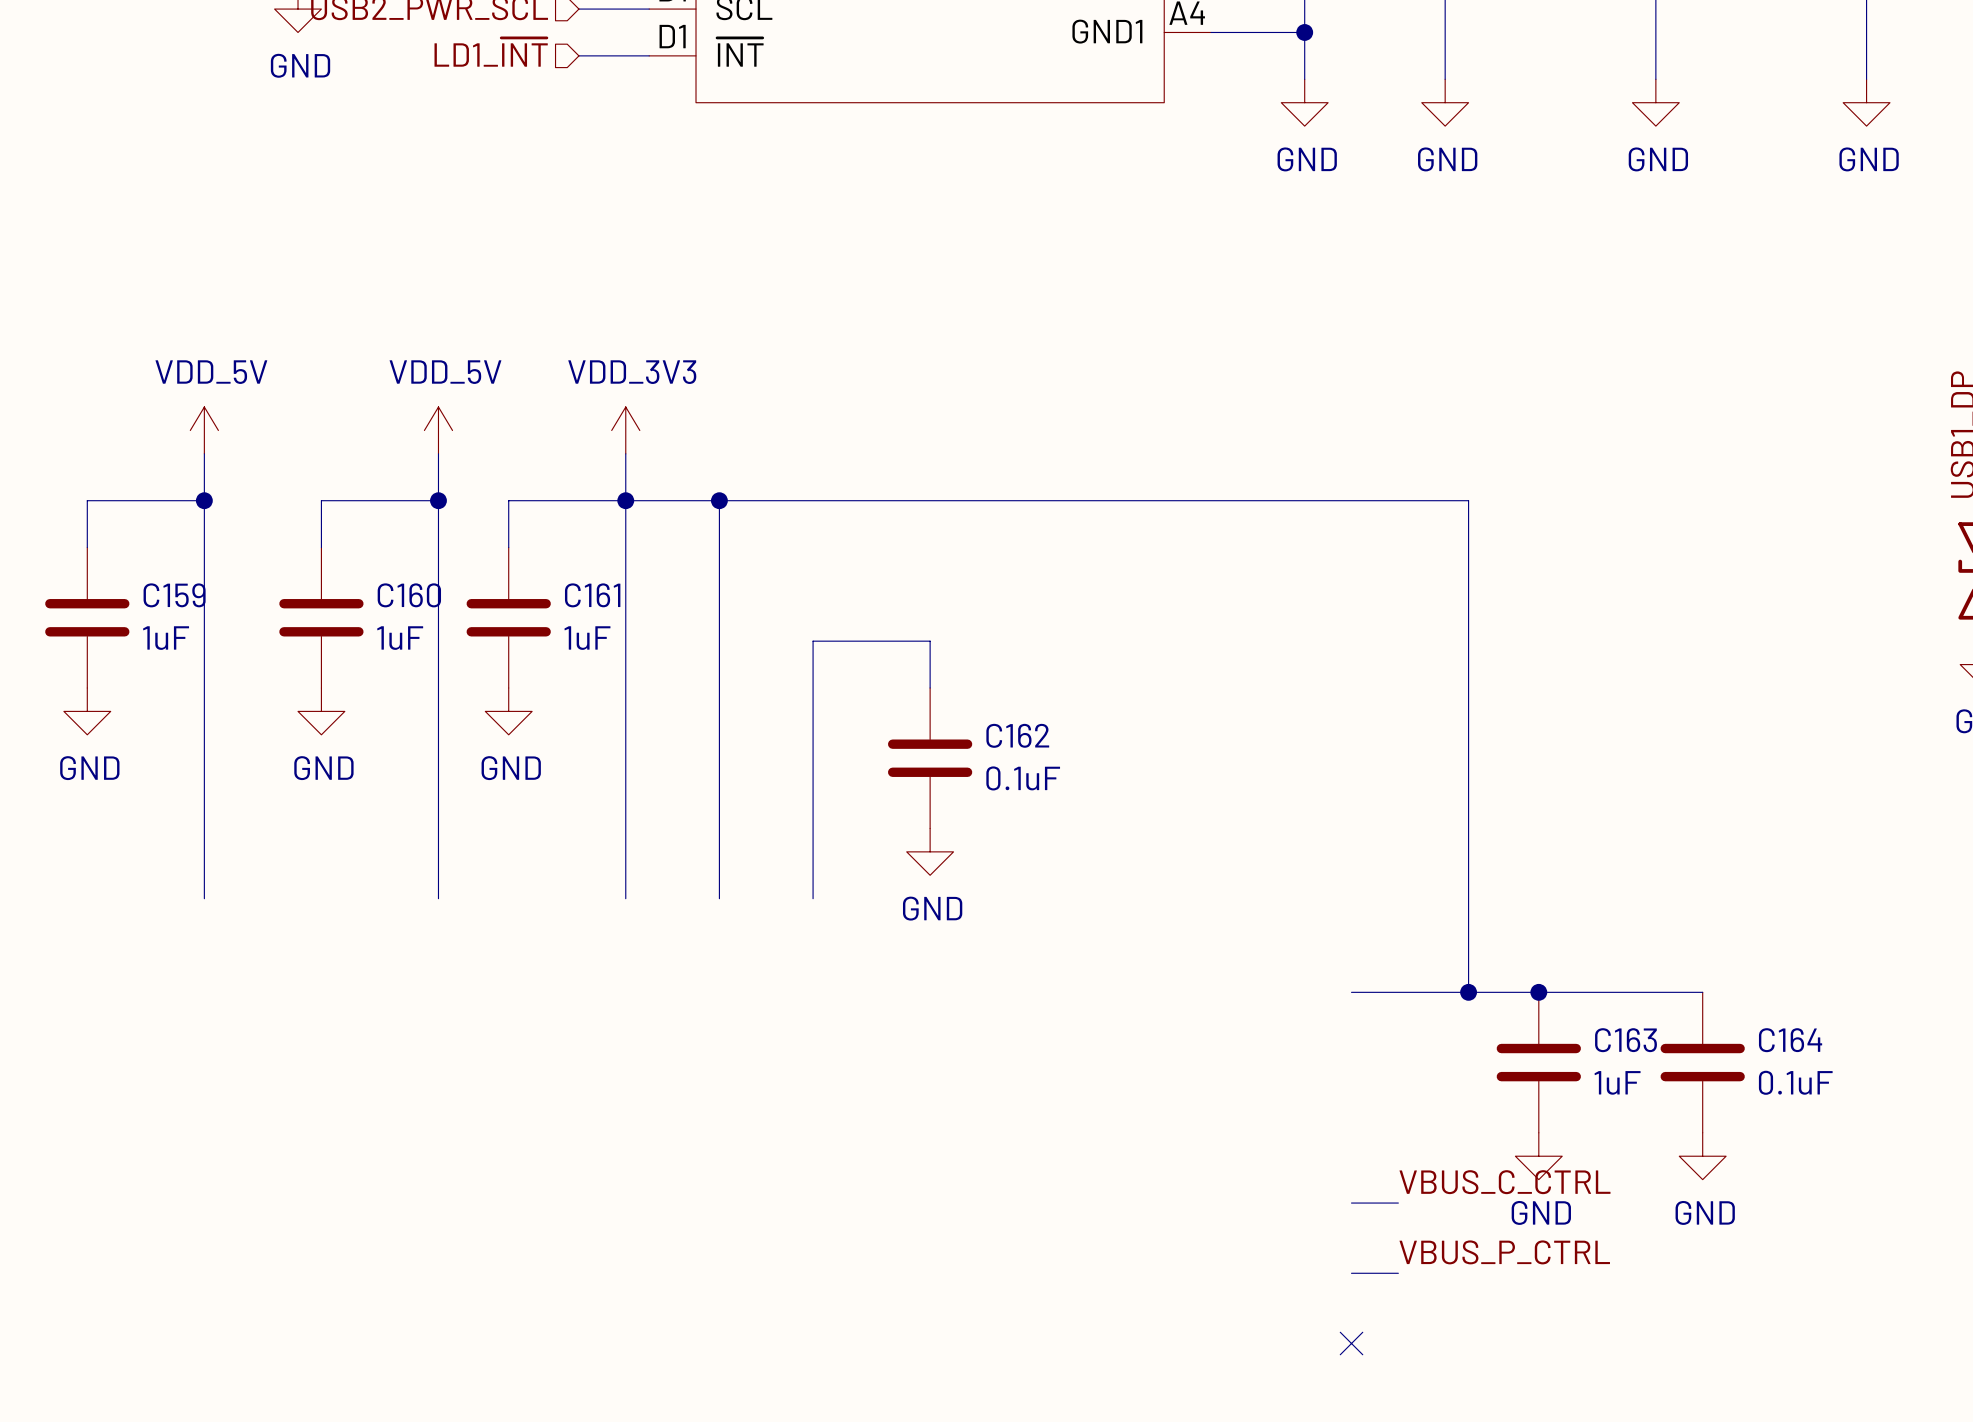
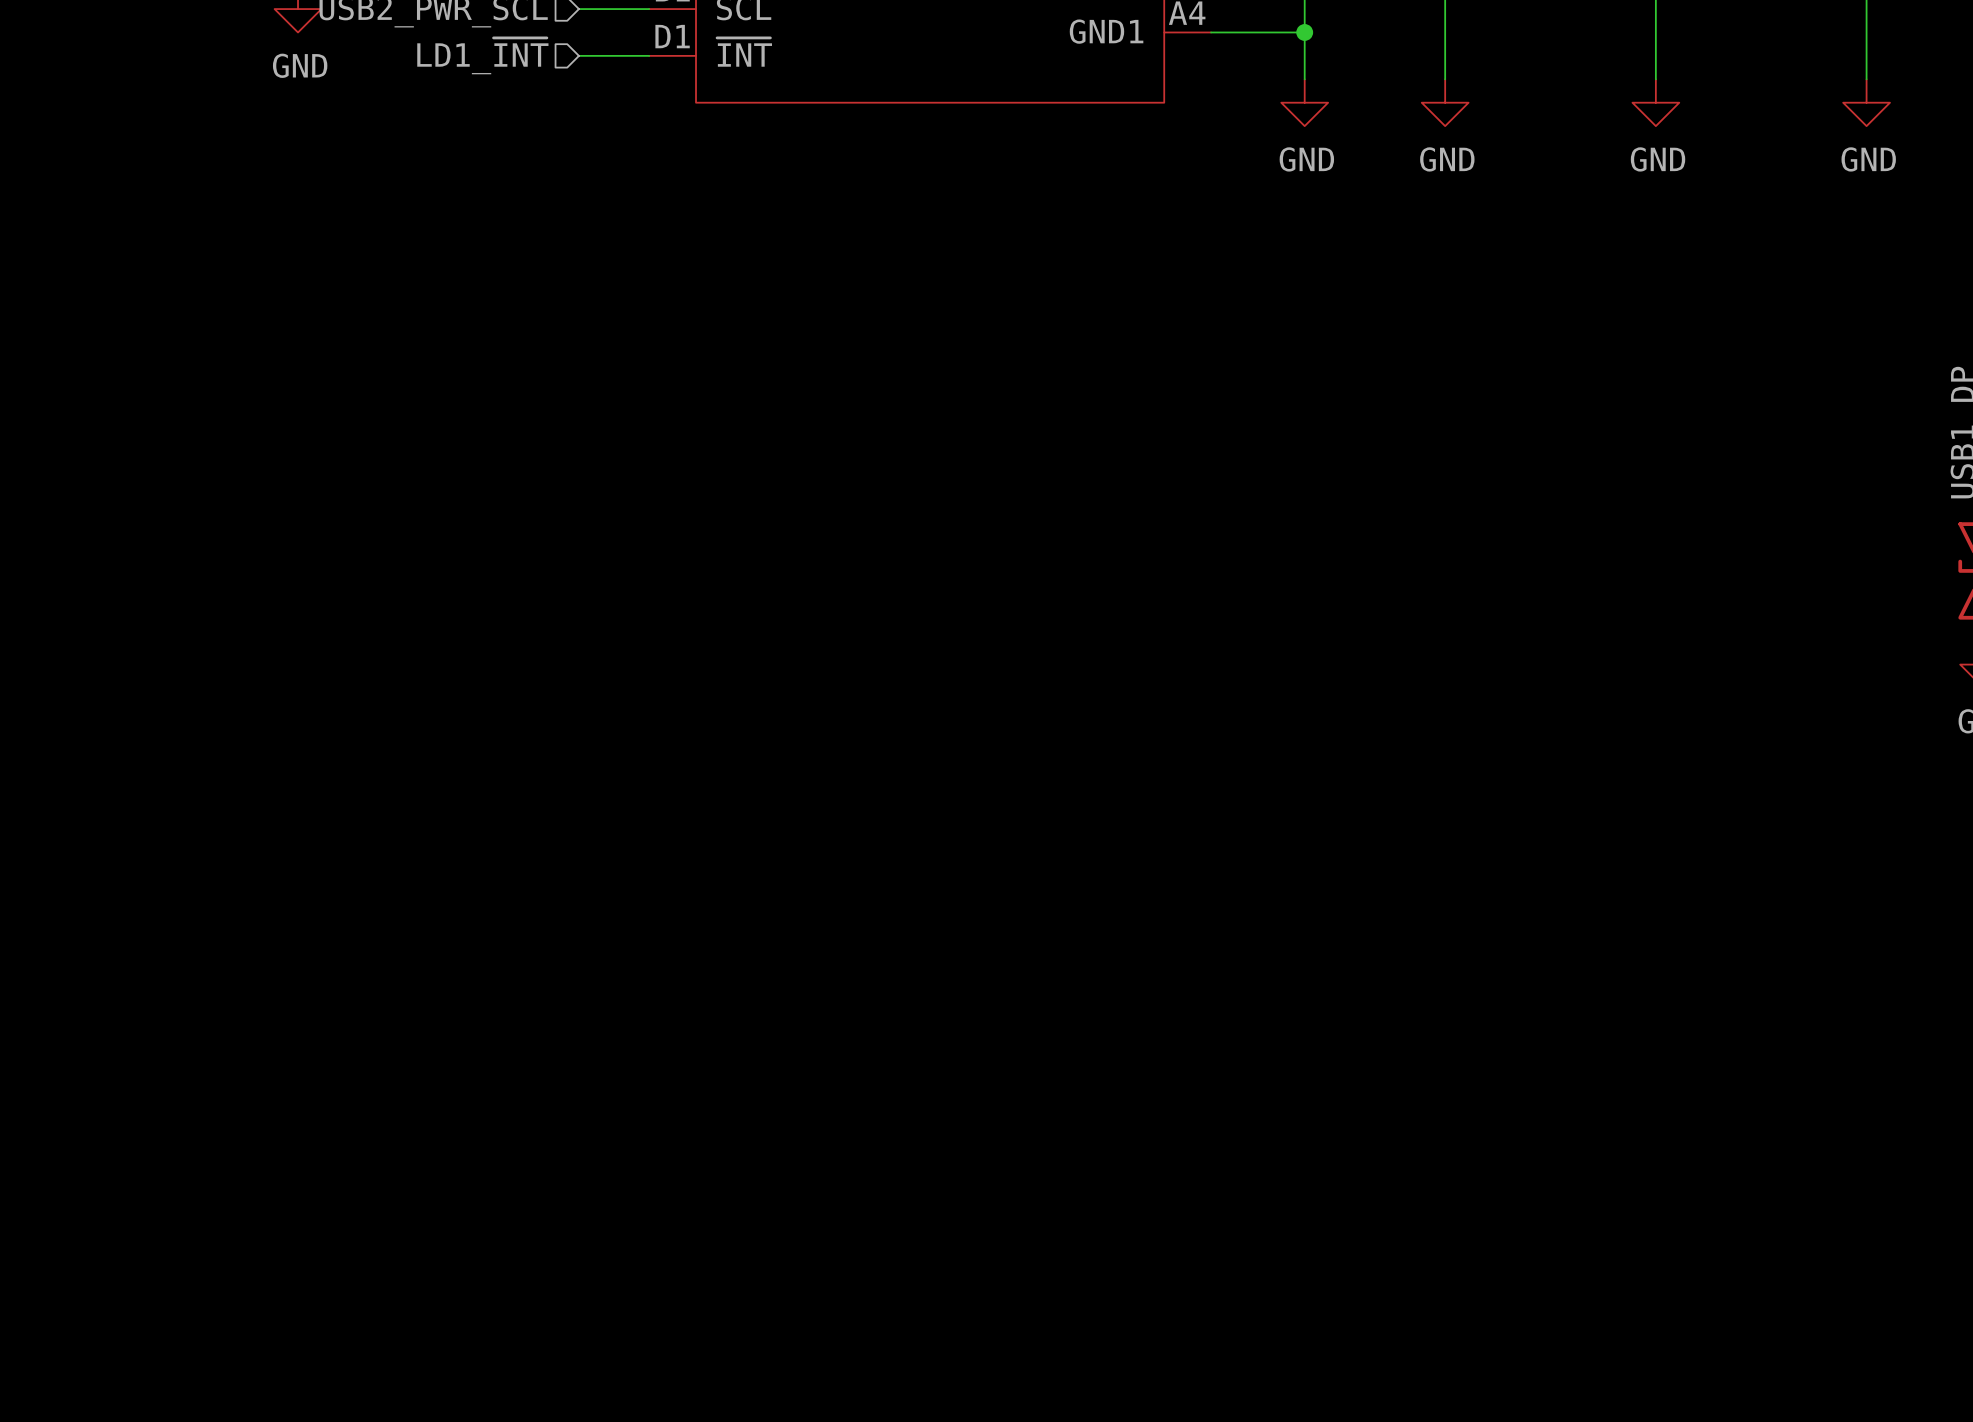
power symbol: VDD_5V (204, 430) -> none
power symbol: VDD_5V (438, 430) -> none
power symbol: VDD_3V3 (625, 430) -> none
wire: (204, 453) (204, 898) -> none
wire: (438, 453) (438, 898) -> none
wire: (625, 453) (625, 898) -> none
wire: (204, 500) (87, 500) (87, 547) -> none
junction: (204, 500) -> none
wire: (438, 500) (321, 500) (321, 547) -> none
junction: (438, 500) -> none
junction: (625, 500) -> none
wire: (719, 500) (719, 898) -> none
junction: (719, 500) -> none
wire: (508, 547) (508, 500) (1468, 500) (1468, 992) -> none
C159: 1uF (87, 617) -> none
C160: 1uF (321, 617) -> none
C161: 1uF (508, 617) -> none
wire: (930, 687) (930, 641) (813, 641) (813, 898) -> none
power symbol: GND (87, 711) -> none
power symbol: GND (321, 711) -> none
power symbol: GND (508, 711) -> none
C162: 0.1uF (930, 758) -> none
power symbol: GND (930, 851) -> none
wire: (1351, 992) (1702, 992) -> none
junction: (1468, 992) -> none
junction: (1538, 992) -> none
C163: 1uF (1538, 1062) -> none
C164: 0.1uF (1702, 1062) -> none
power symbol: GND (1538, 1156) -> none
power symbol: GND (1702, 1156) -> none
label: VBUS_C_CTRL (1505, 1182) -> none
wire: (1351, 1203) (1398, 1203) -> none
label: VBUS_P_CTRL (1504, 1252) -> none
wire: (1351, 1273) (1398, 1273) -> none
no-connect mark: (1351, 1343) -> none

